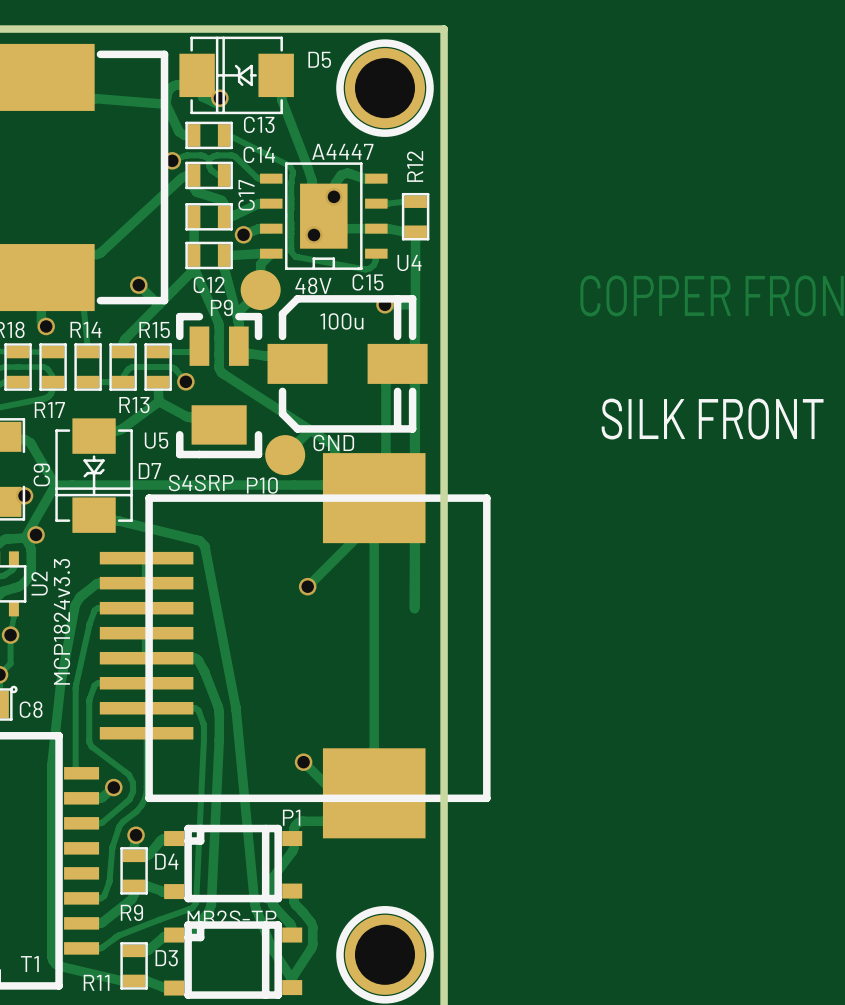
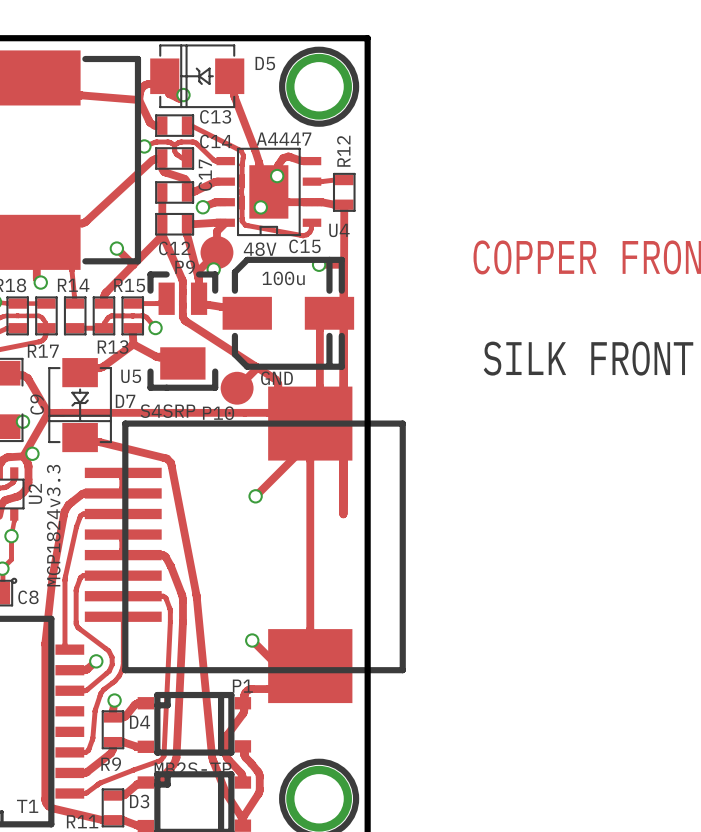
via: none -> (213, 269)

